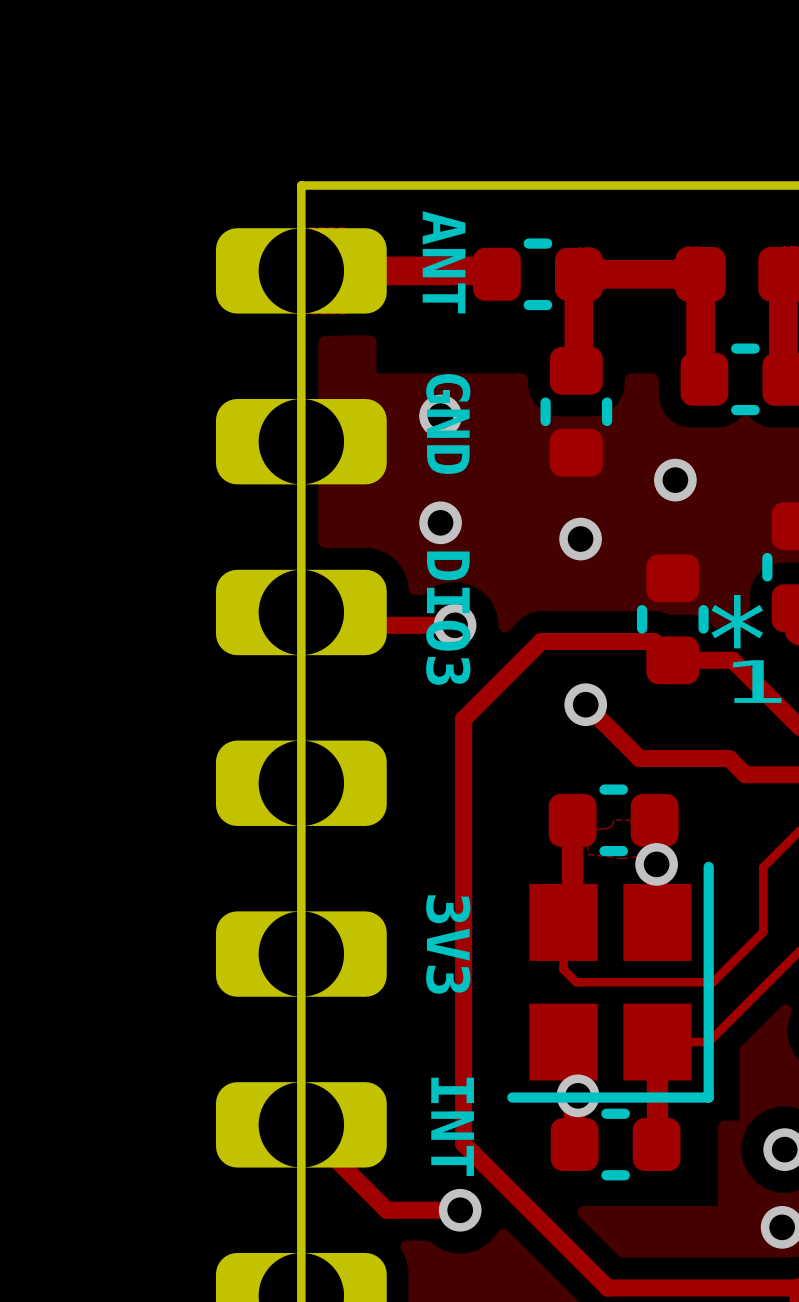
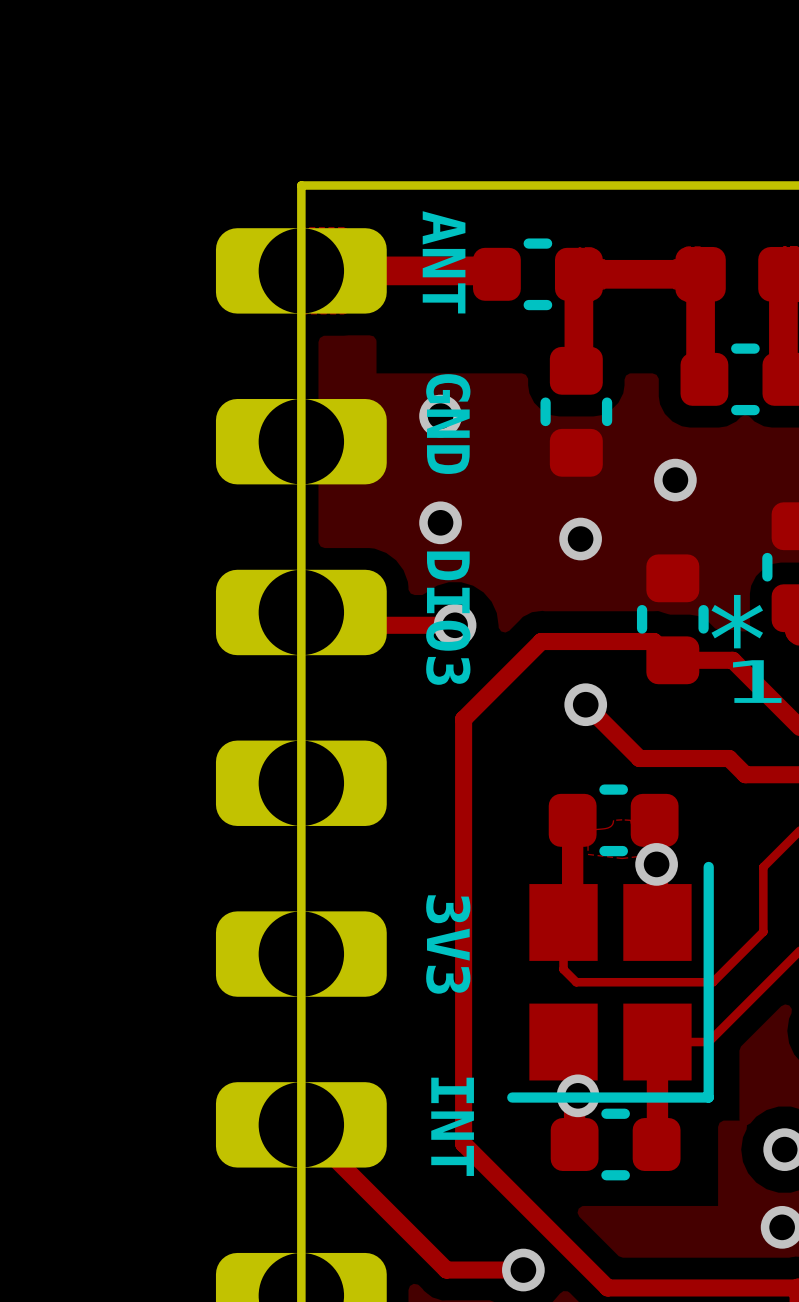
track: (386, 1210) (460, 1210) -> (386, 1210) (446, 1270) (523, 1270)
via: (460, 1210) -> none
via: none -> (523, 1270)

